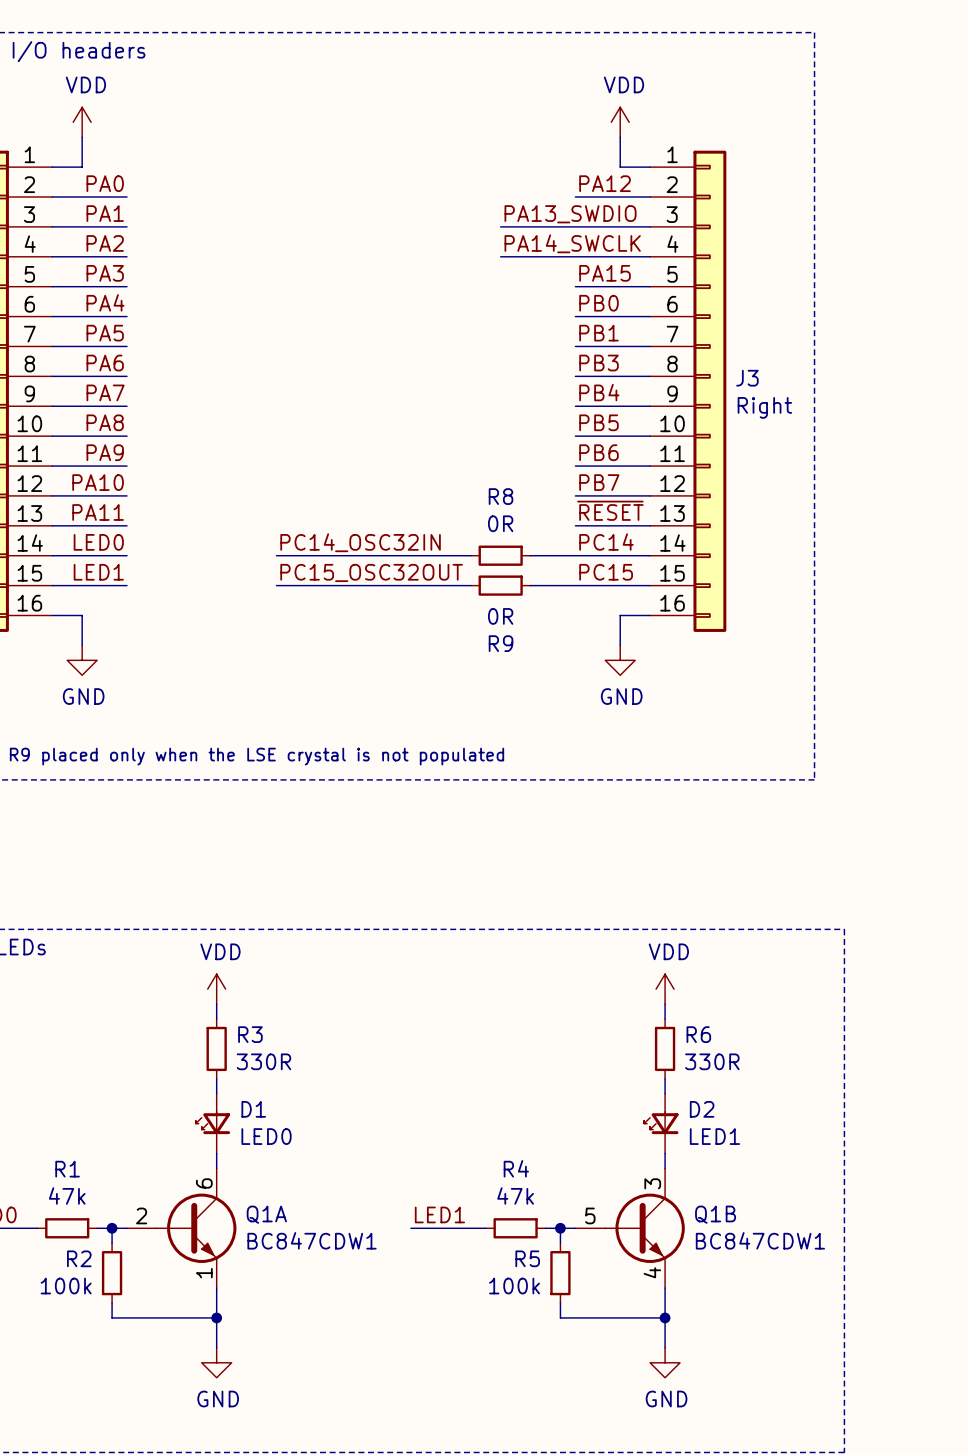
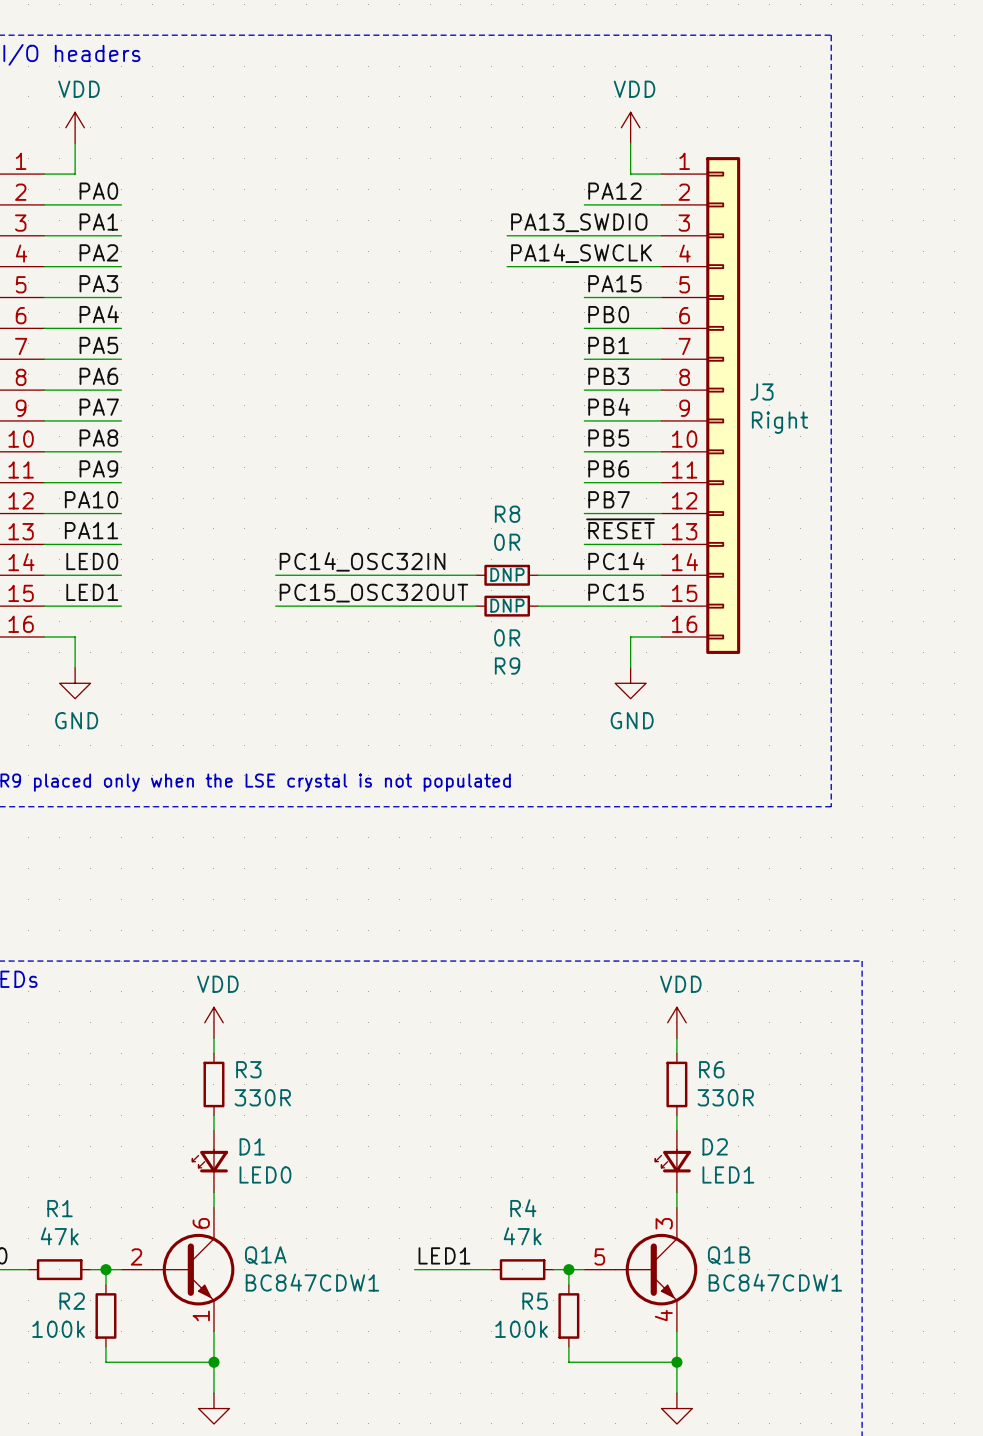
R8 text: none -> DNP (507, 574)
R9 text: none -> DNP (507, 605)

